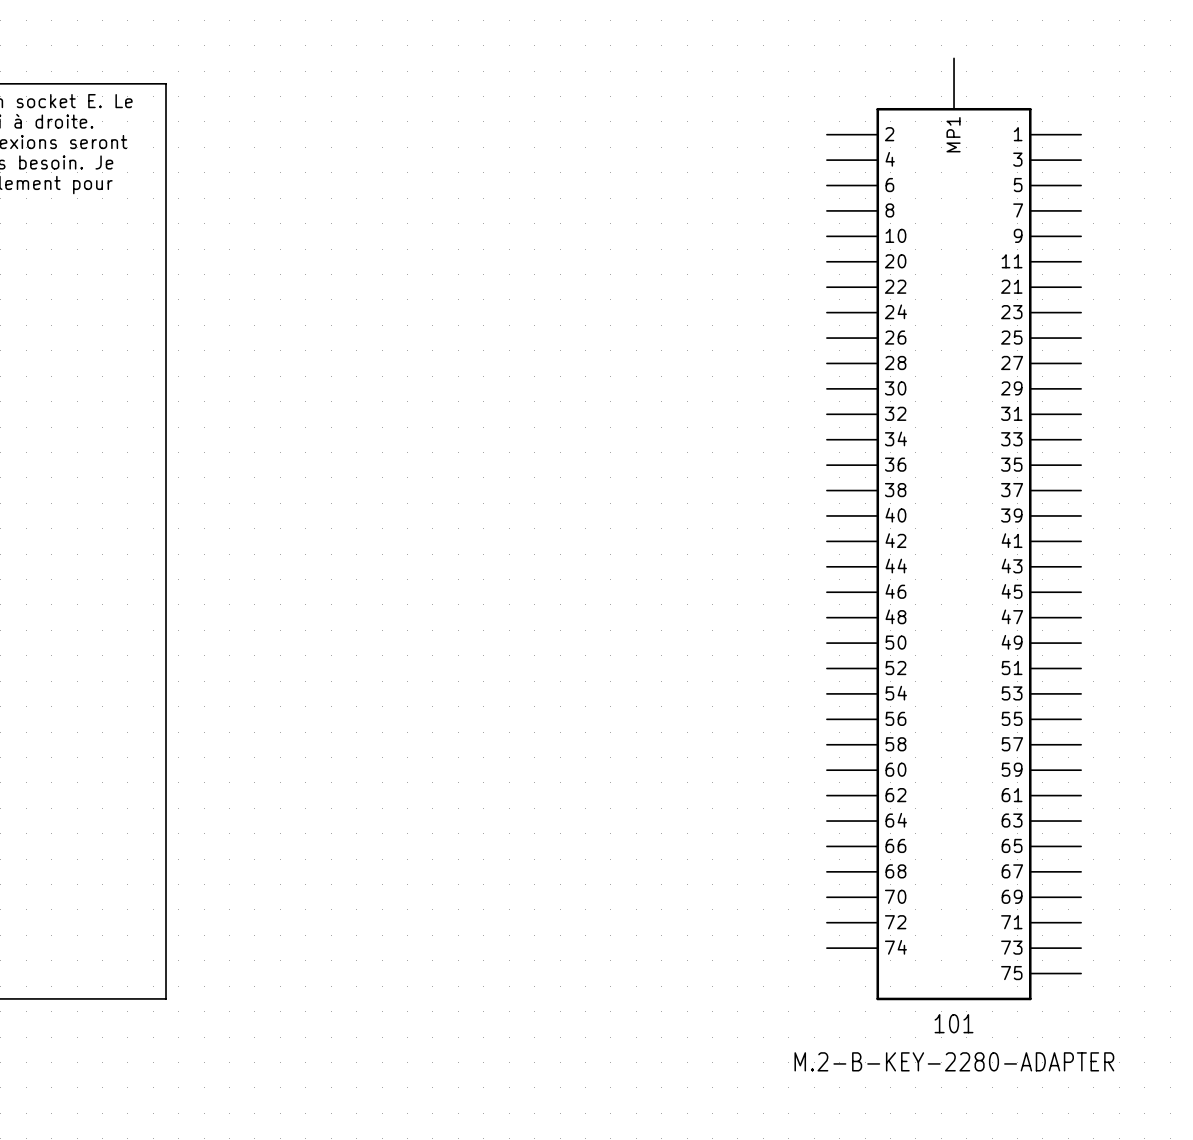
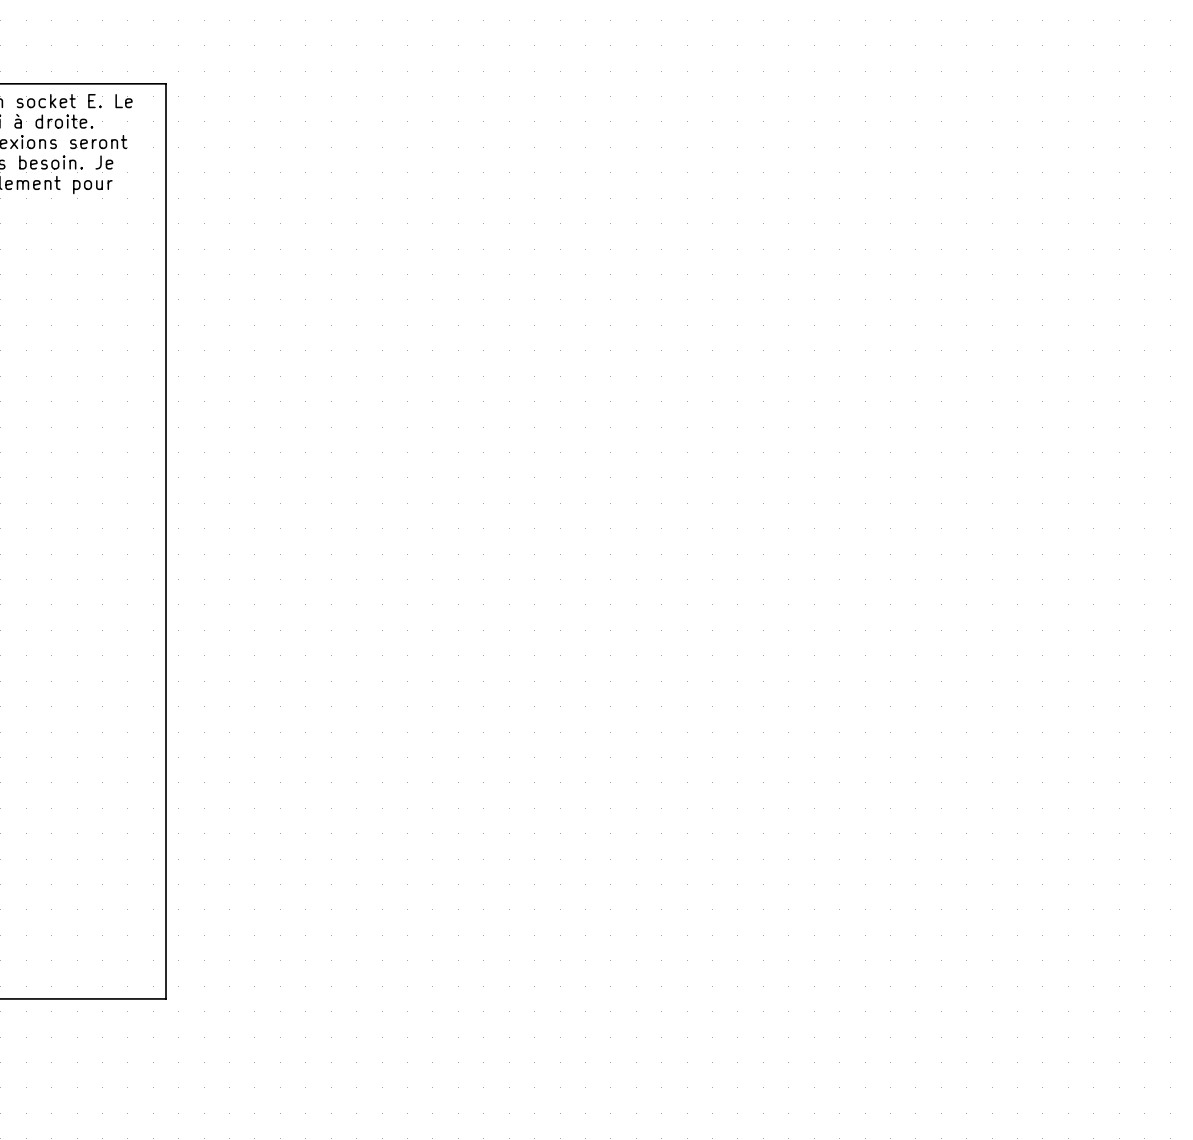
101: M.2-B-KEY-2280-ADAPTER (954, 529) -> none

